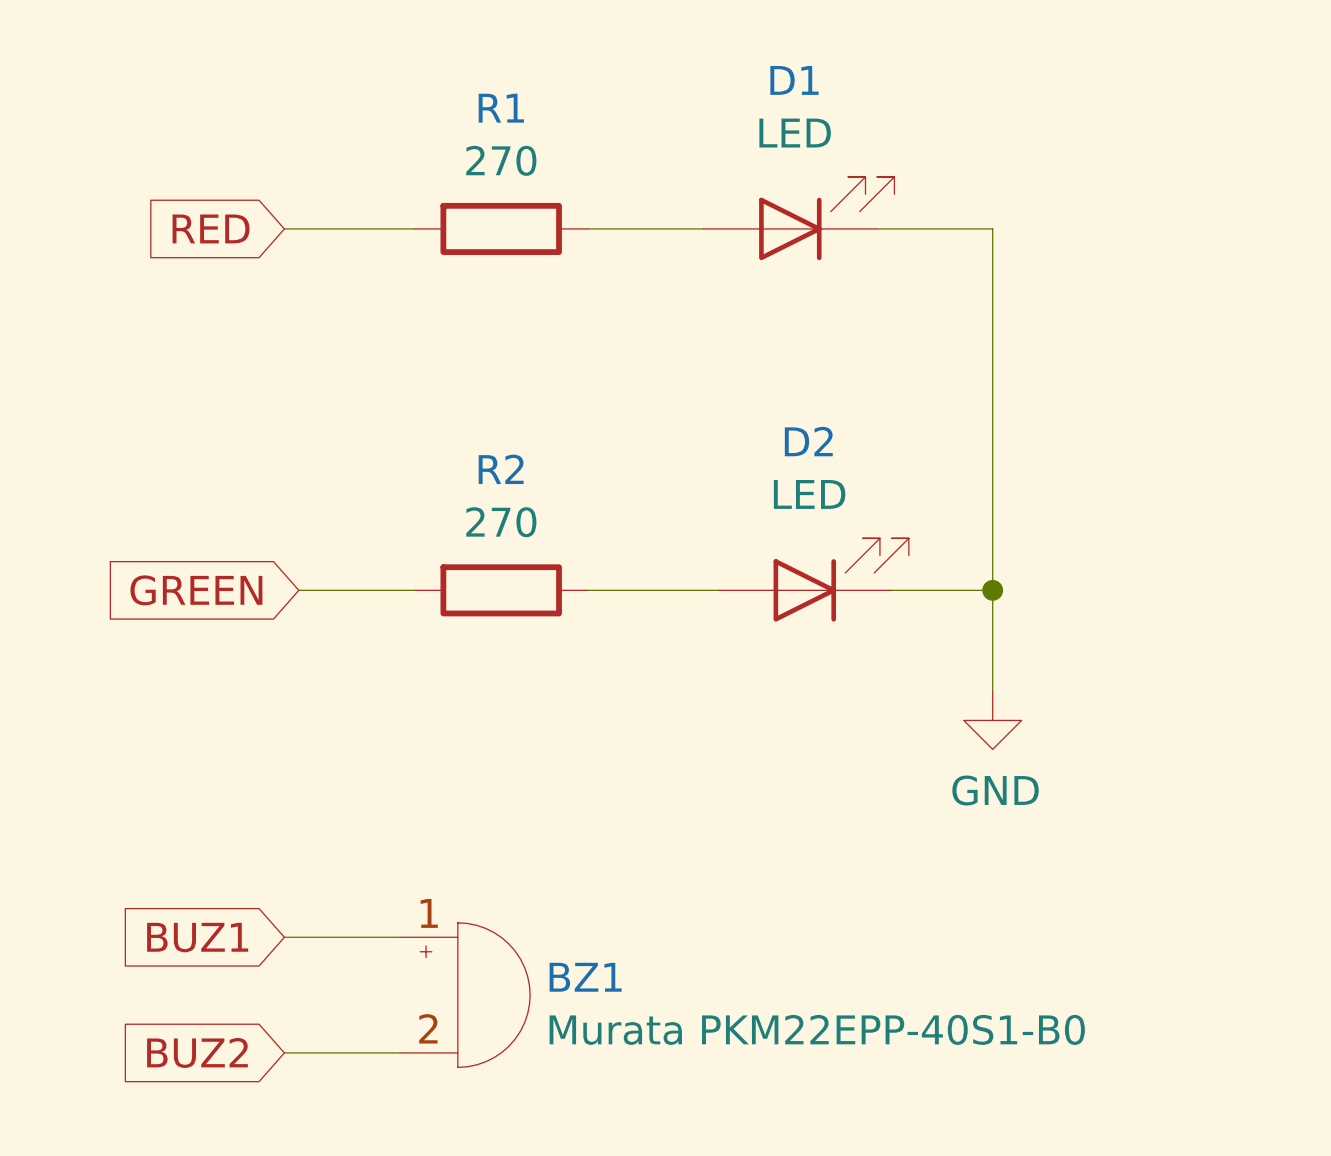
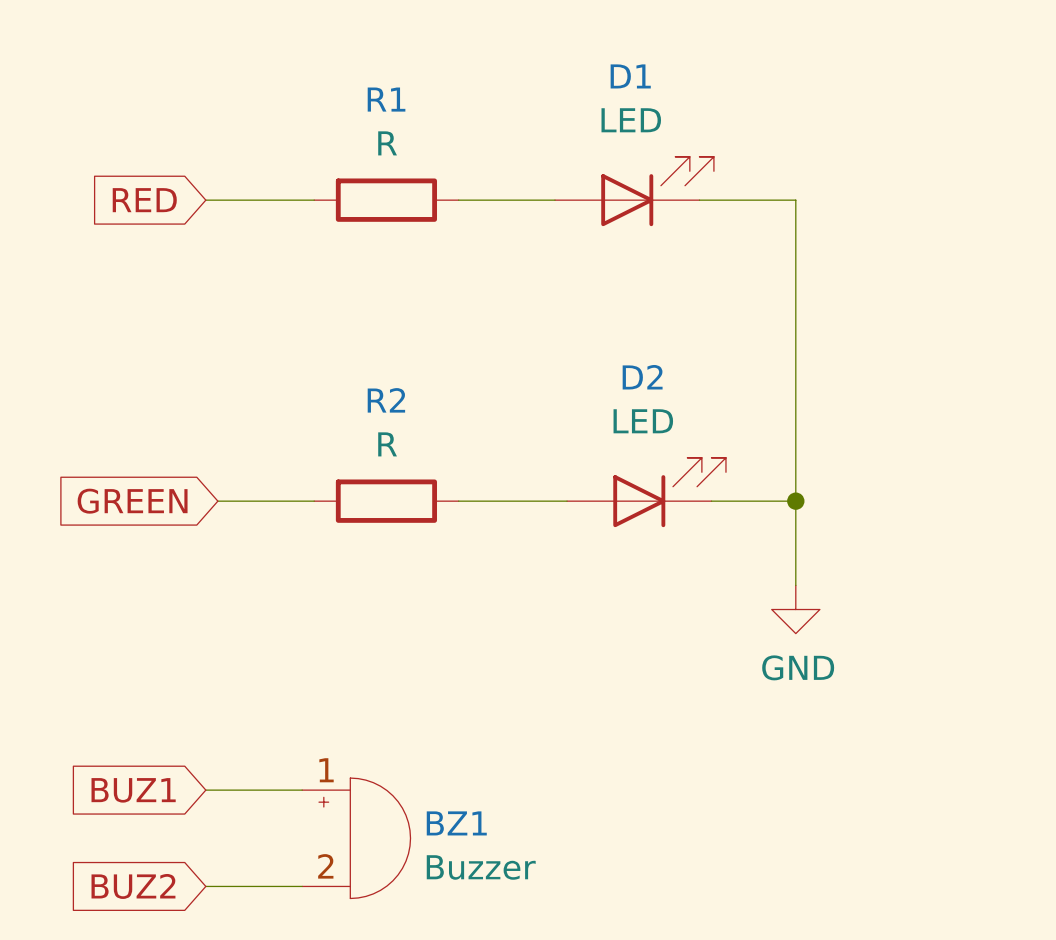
R1 value: 270 (501, 160) -> R (387, 143)
R2 value: 270 (501, 522) -> R (387, 444)
BZ1 value: Murata PKM22EPP-40S1-B0 (817, 1029) -> Buzzer (481, 867)

